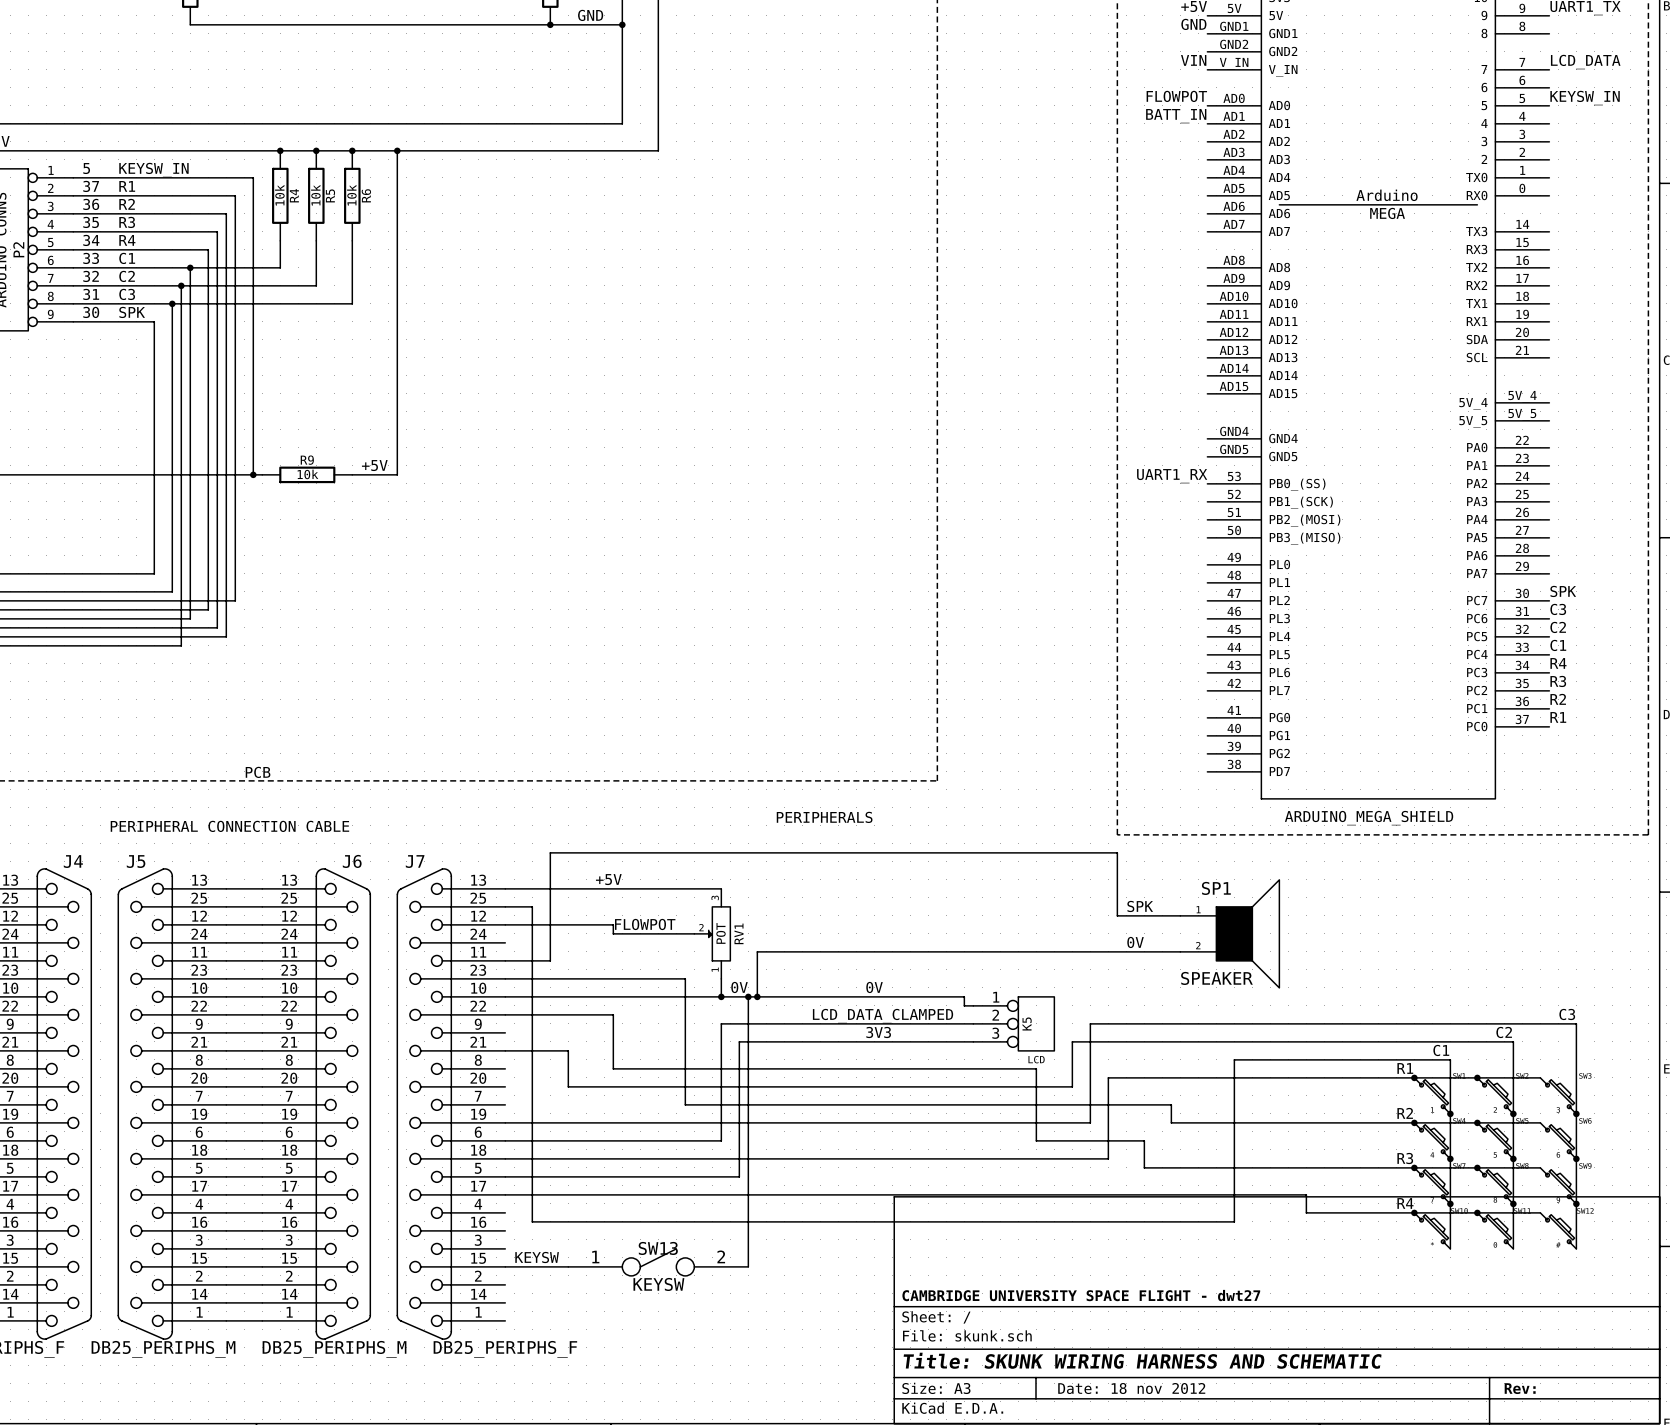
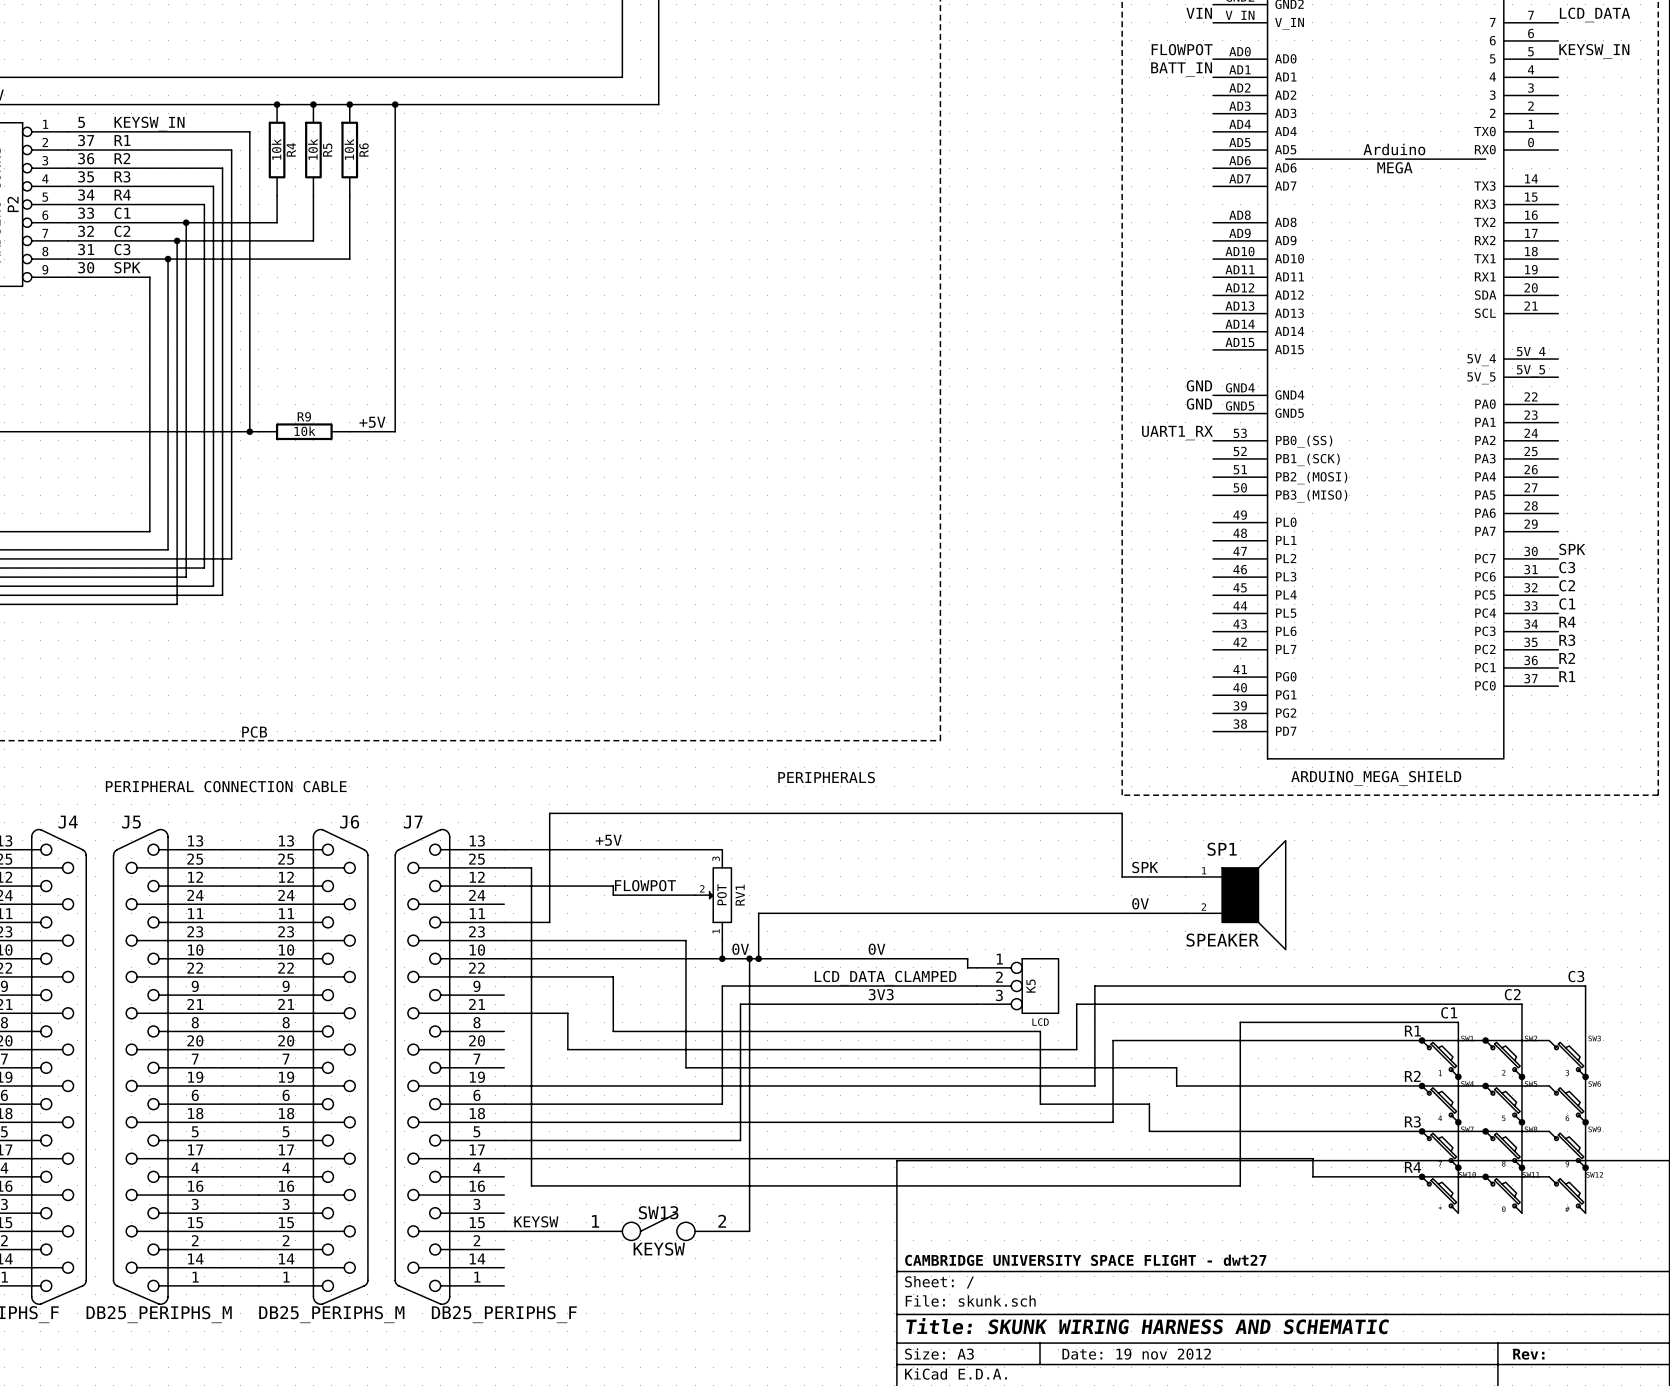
label: none -> GND (1199, 385)
label: none -> GND (1199, 404)
title block: Date: 18 nov 2012 (1131, 1388) -> Date: 19 nov 2012 (1136, 1354)

